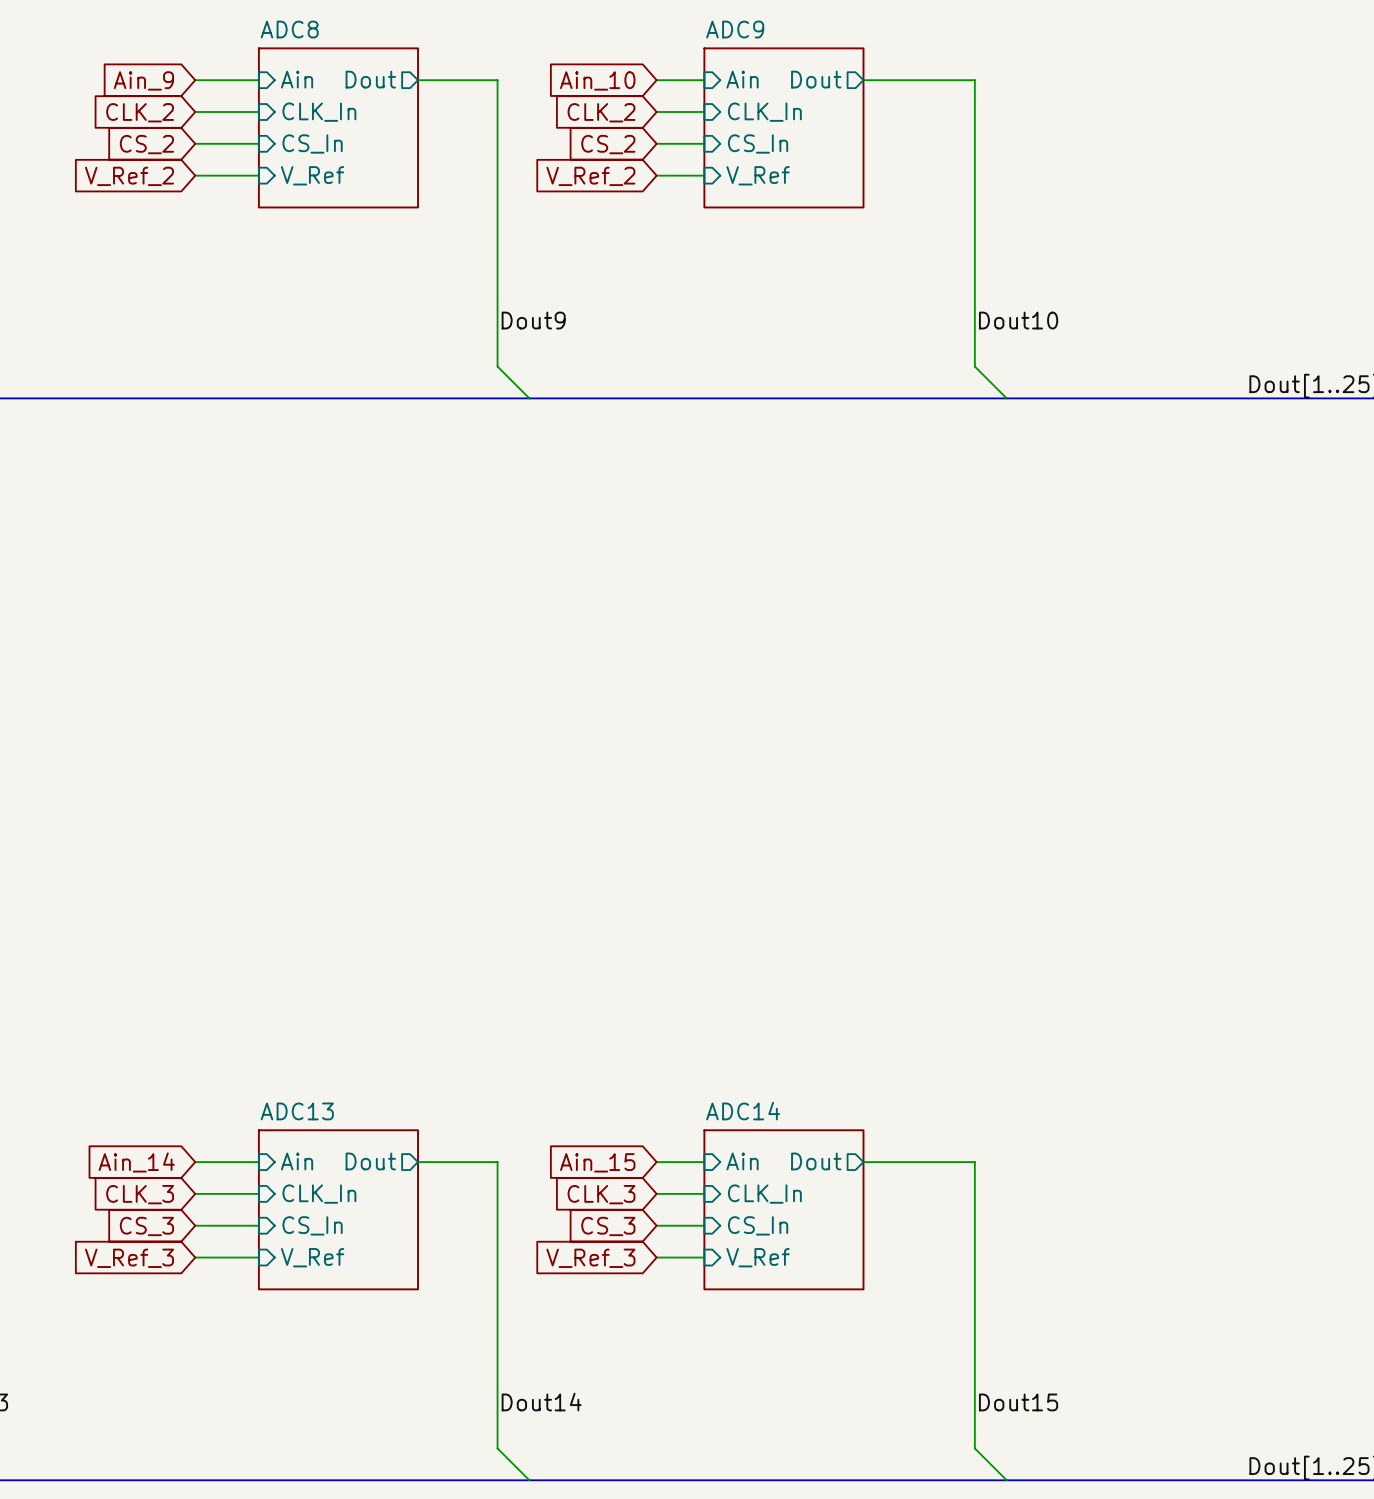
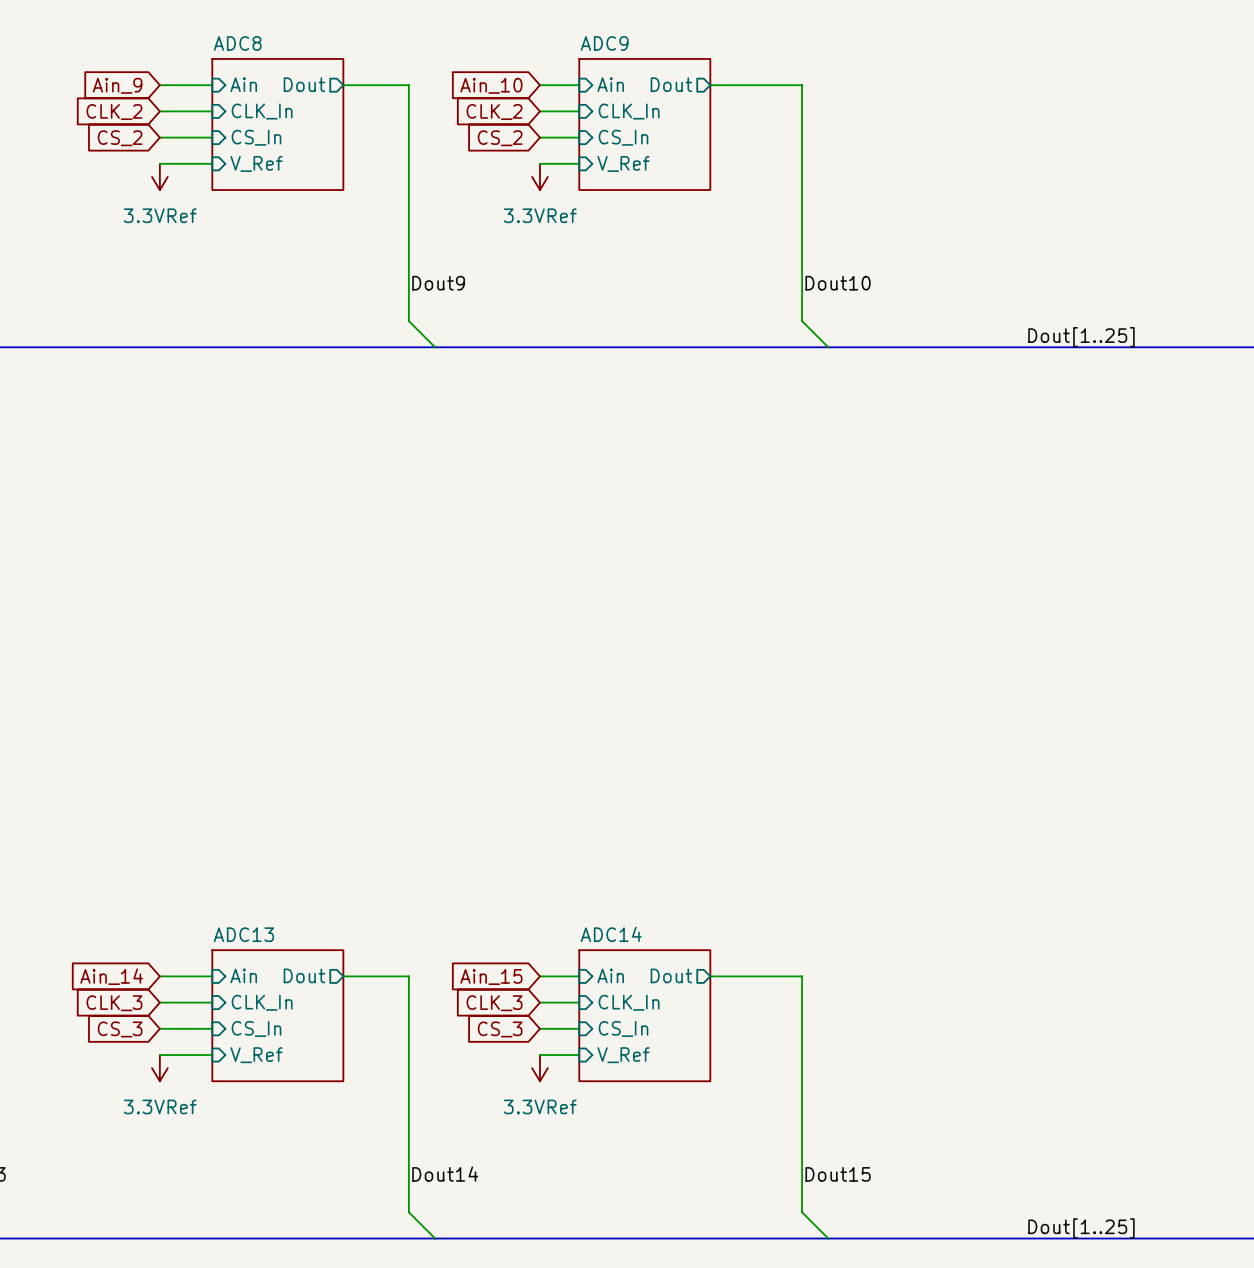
global label: V_Ref_2 (129, 176) -> none
global label: V_Ref_2 (590, 176) -> none
power symbol: none -> 3.3VRef (159, 176)
power symbol: none -> 3.3VRef (539, 176)
global label: V_Ref_3 (129, 1258) -> none
global label: V_Ref_3 (590, 1258) -> none
power symbol: none -> 3.3VRef (159, 1068)
power symbol: none -> 3.3VRef (539, 1068)

